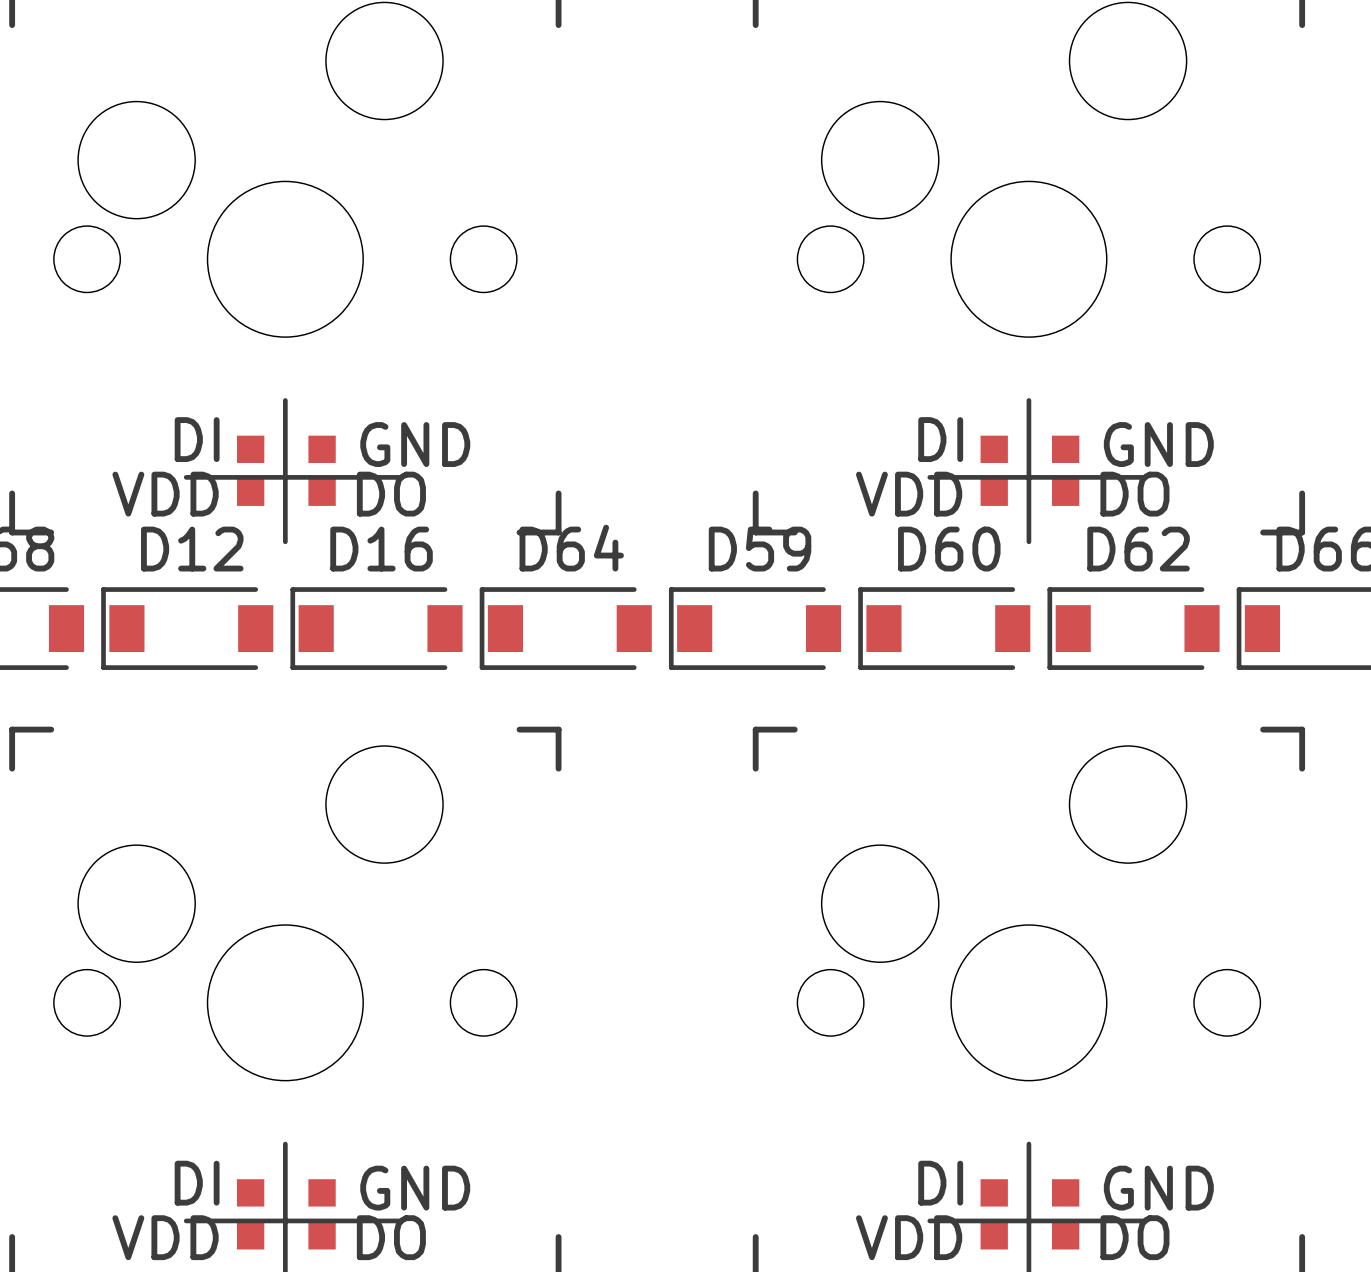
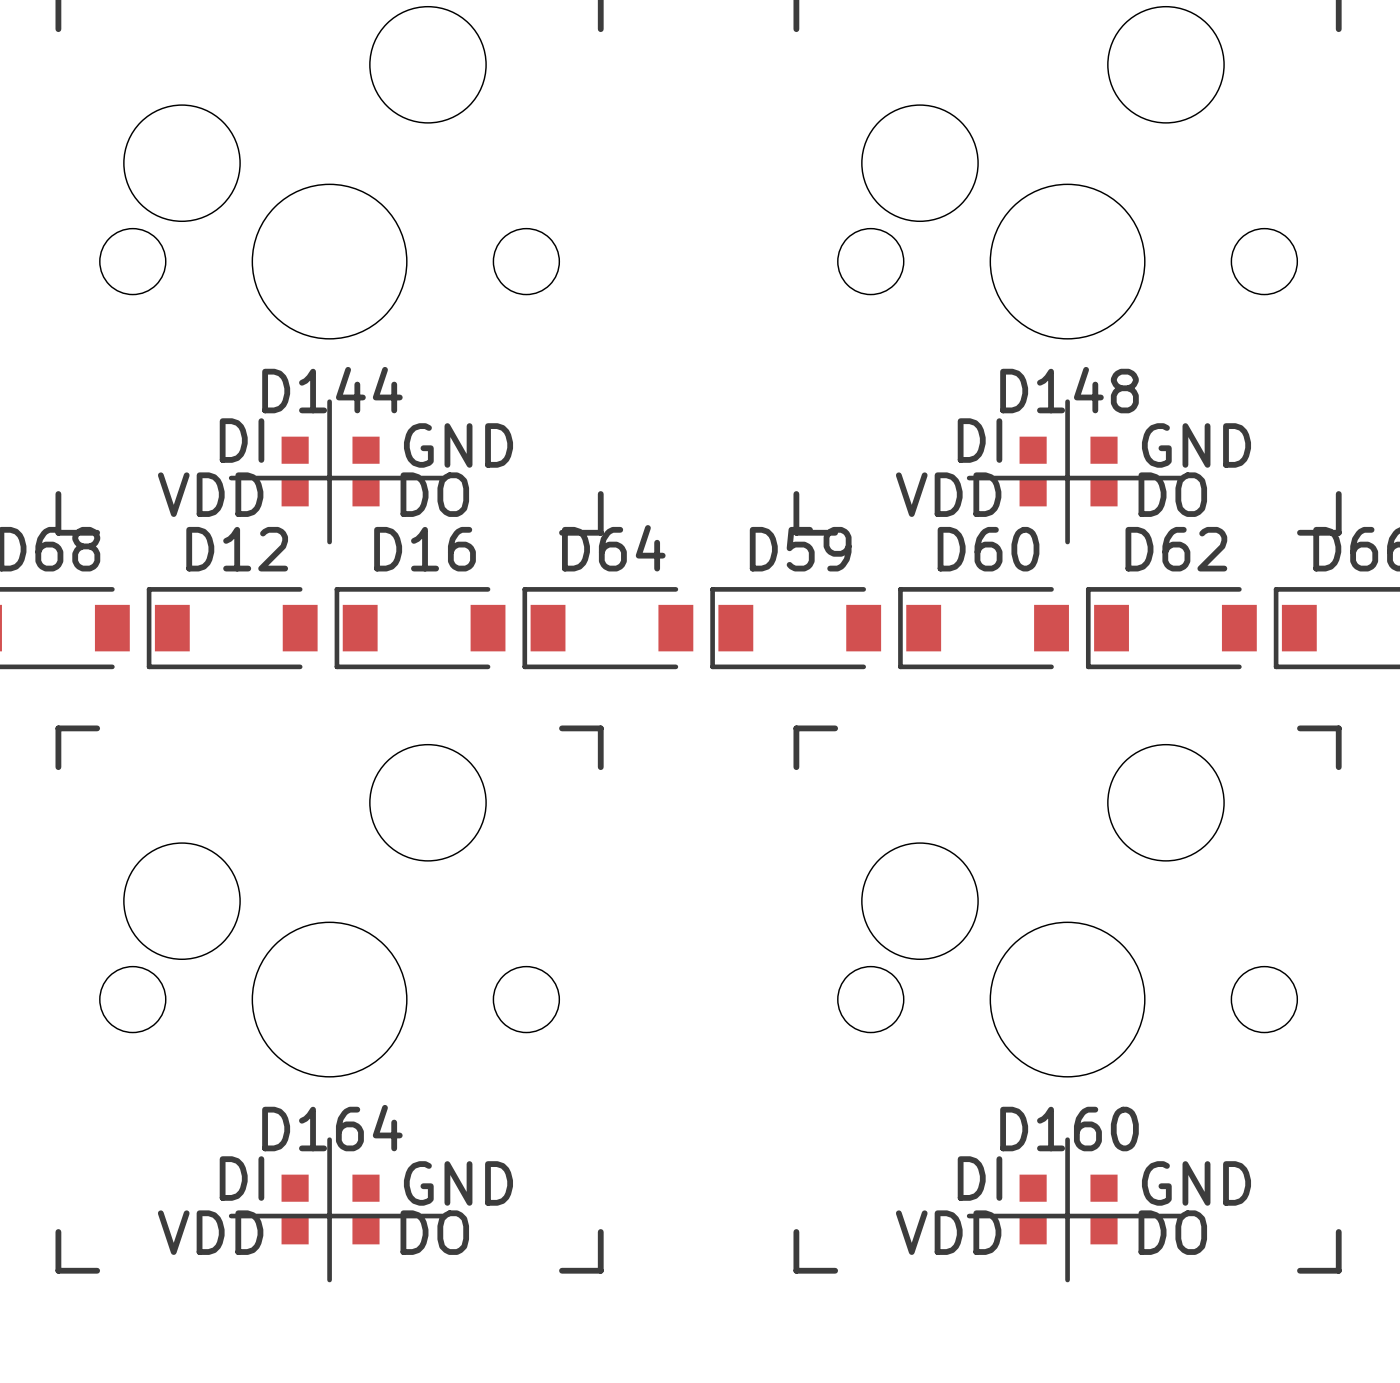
D144 name: none -> D144 (332, 390)
D148 name: none -> D148 (1069, 390)
D164 name: none -> D164 (332, 1128)
D160 name: none -> D160 (1069, 1129)

